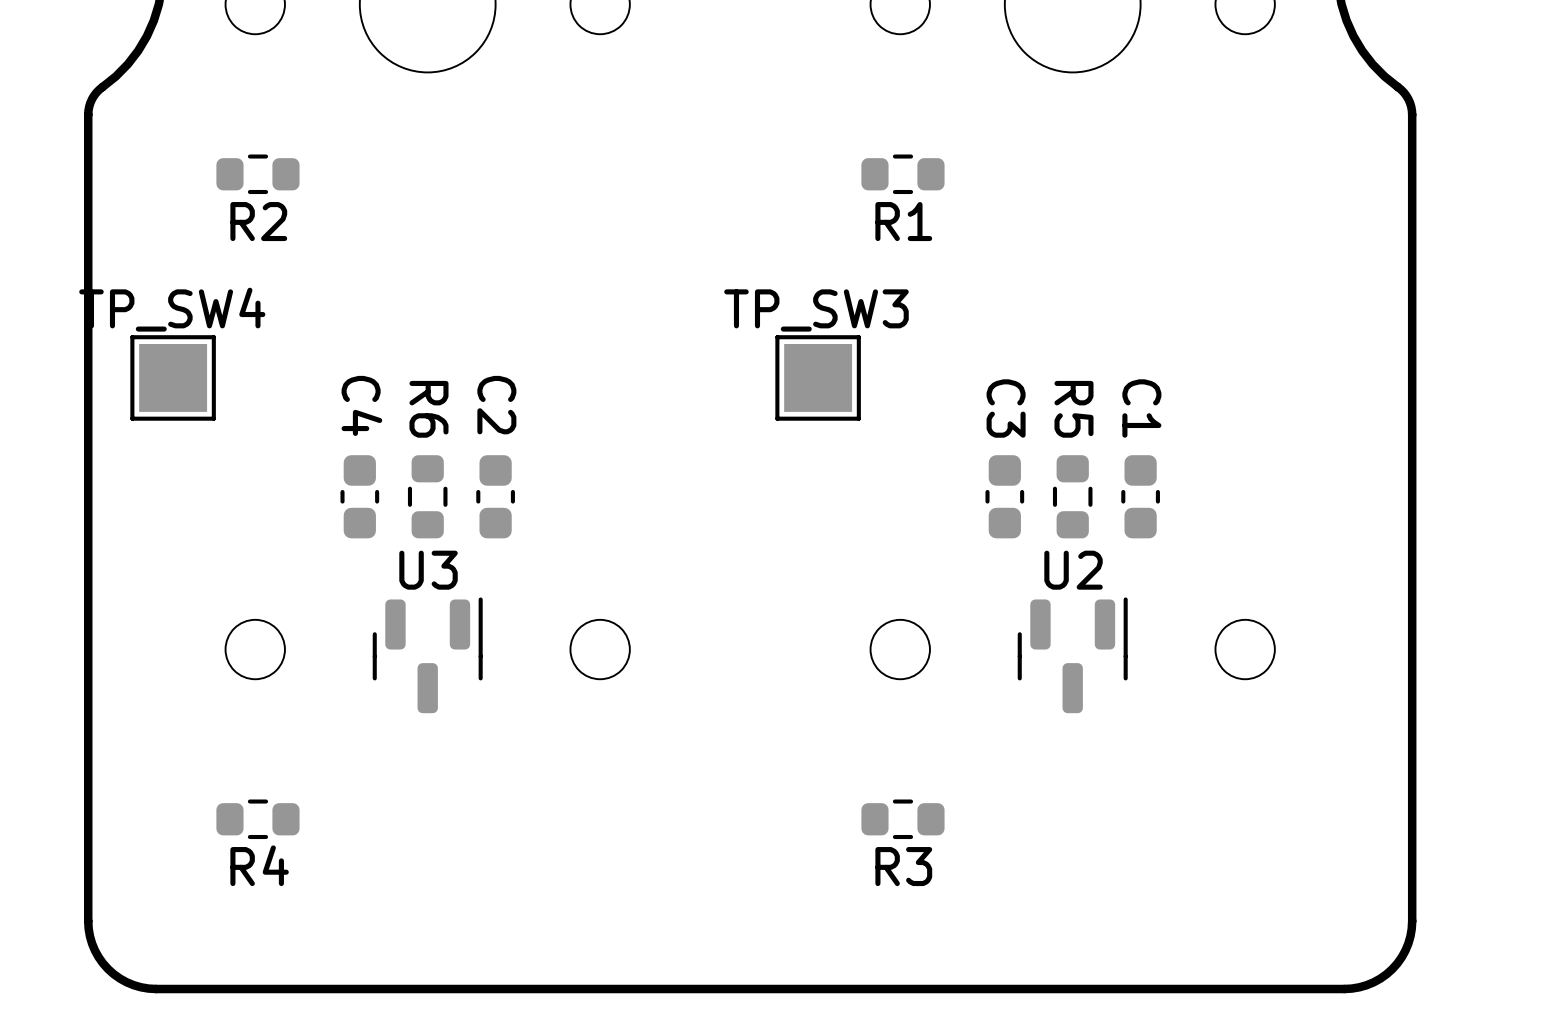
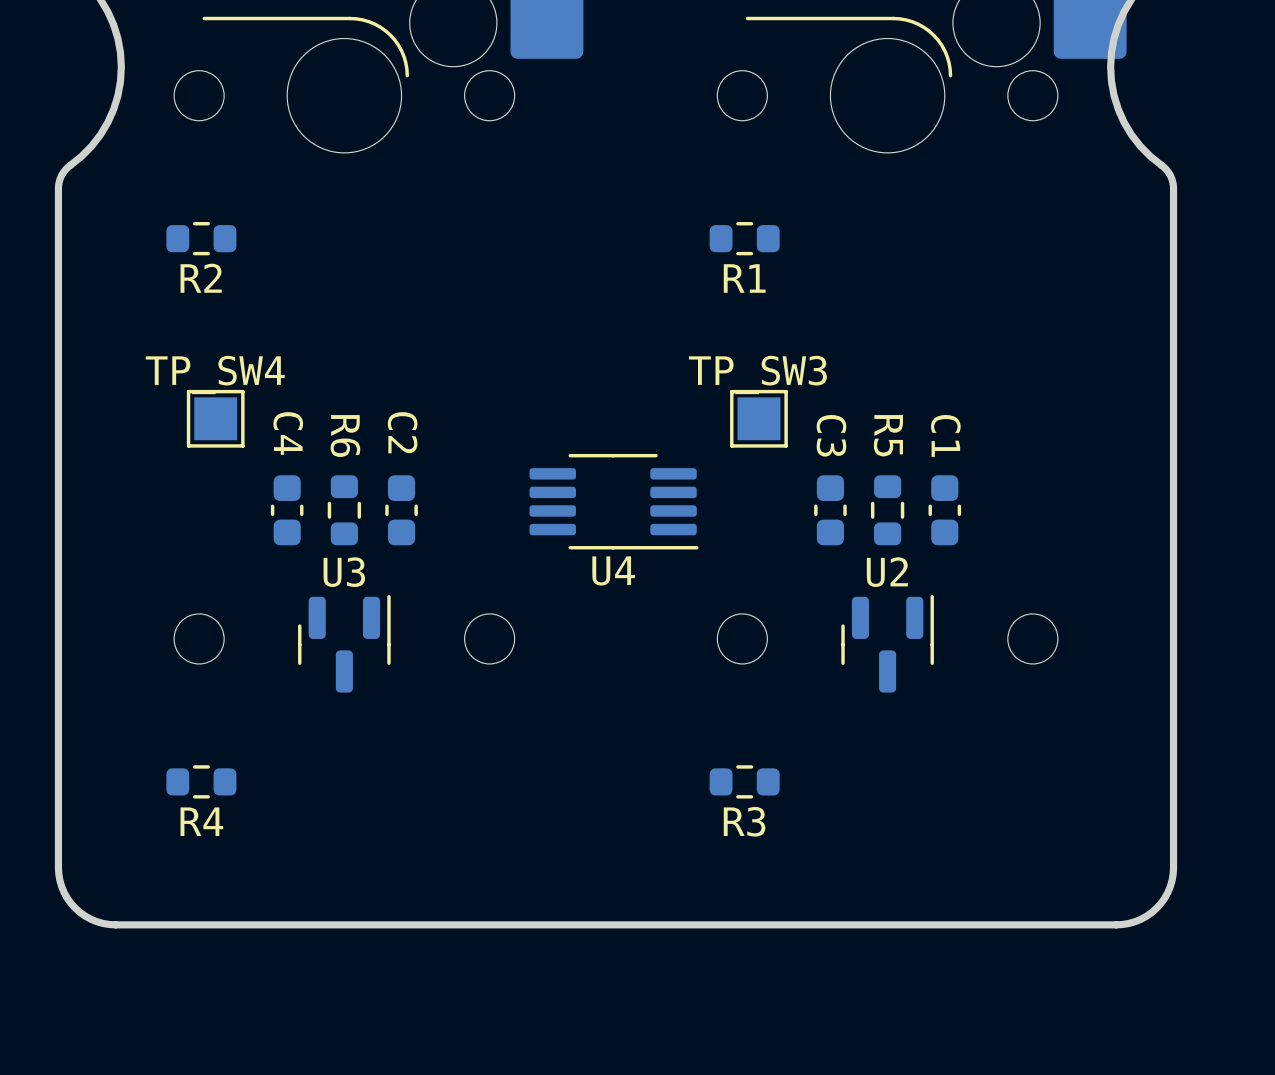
TP_SW4 footprint: [130, 335, 216, 421] -> [186, 389, 245, 448]
TP_SW3 footprint: [775, 335, 861, 421] -> [730, 389, 788, 448]
U4: none -> (613, 501)

